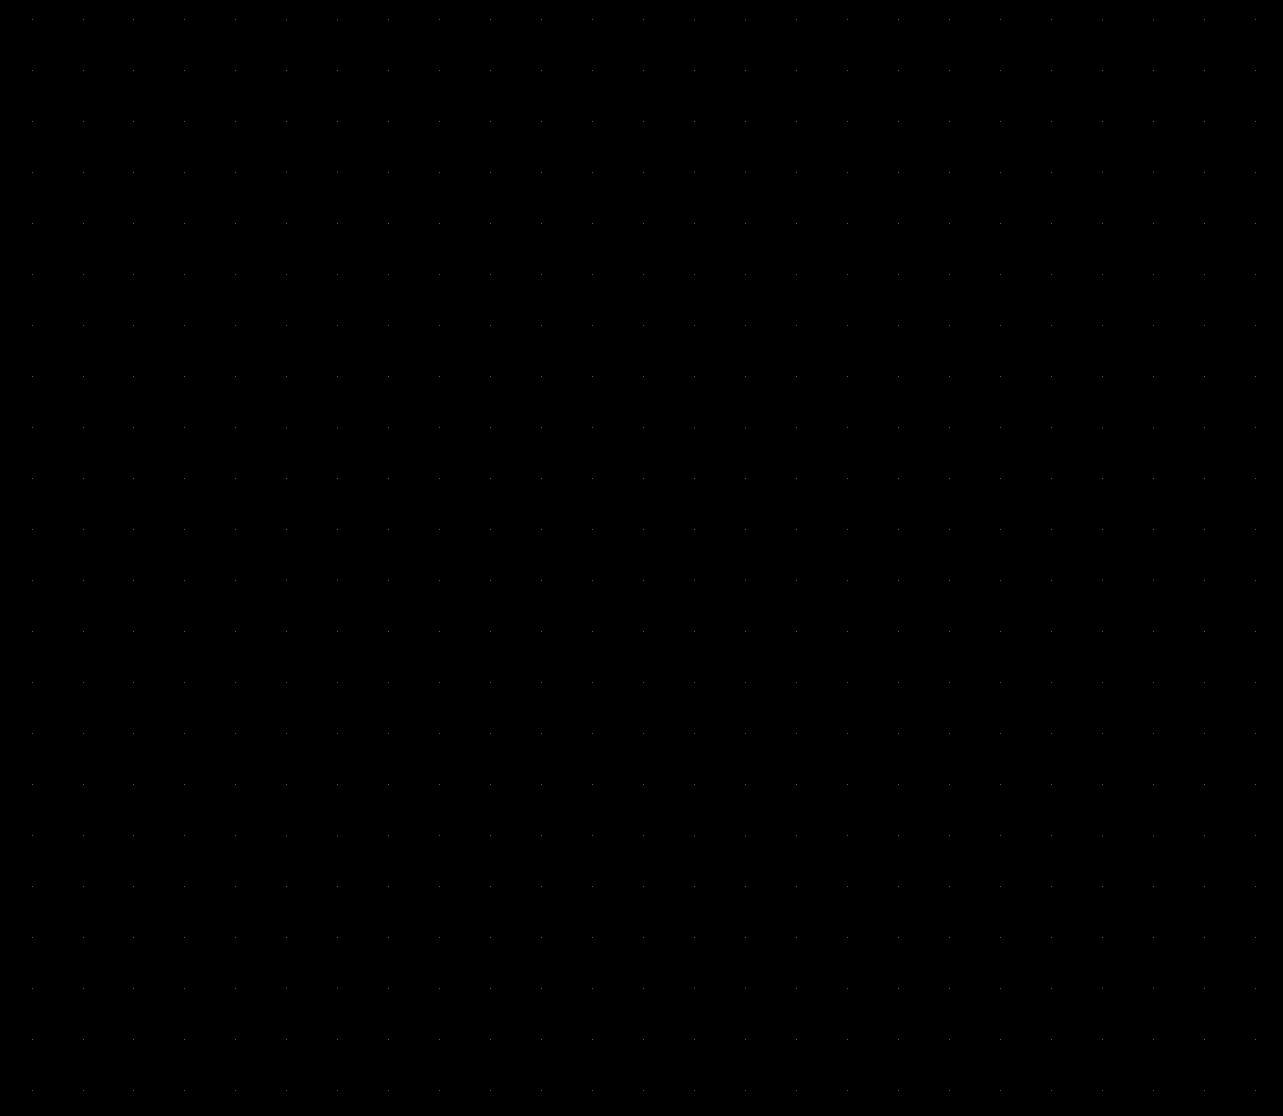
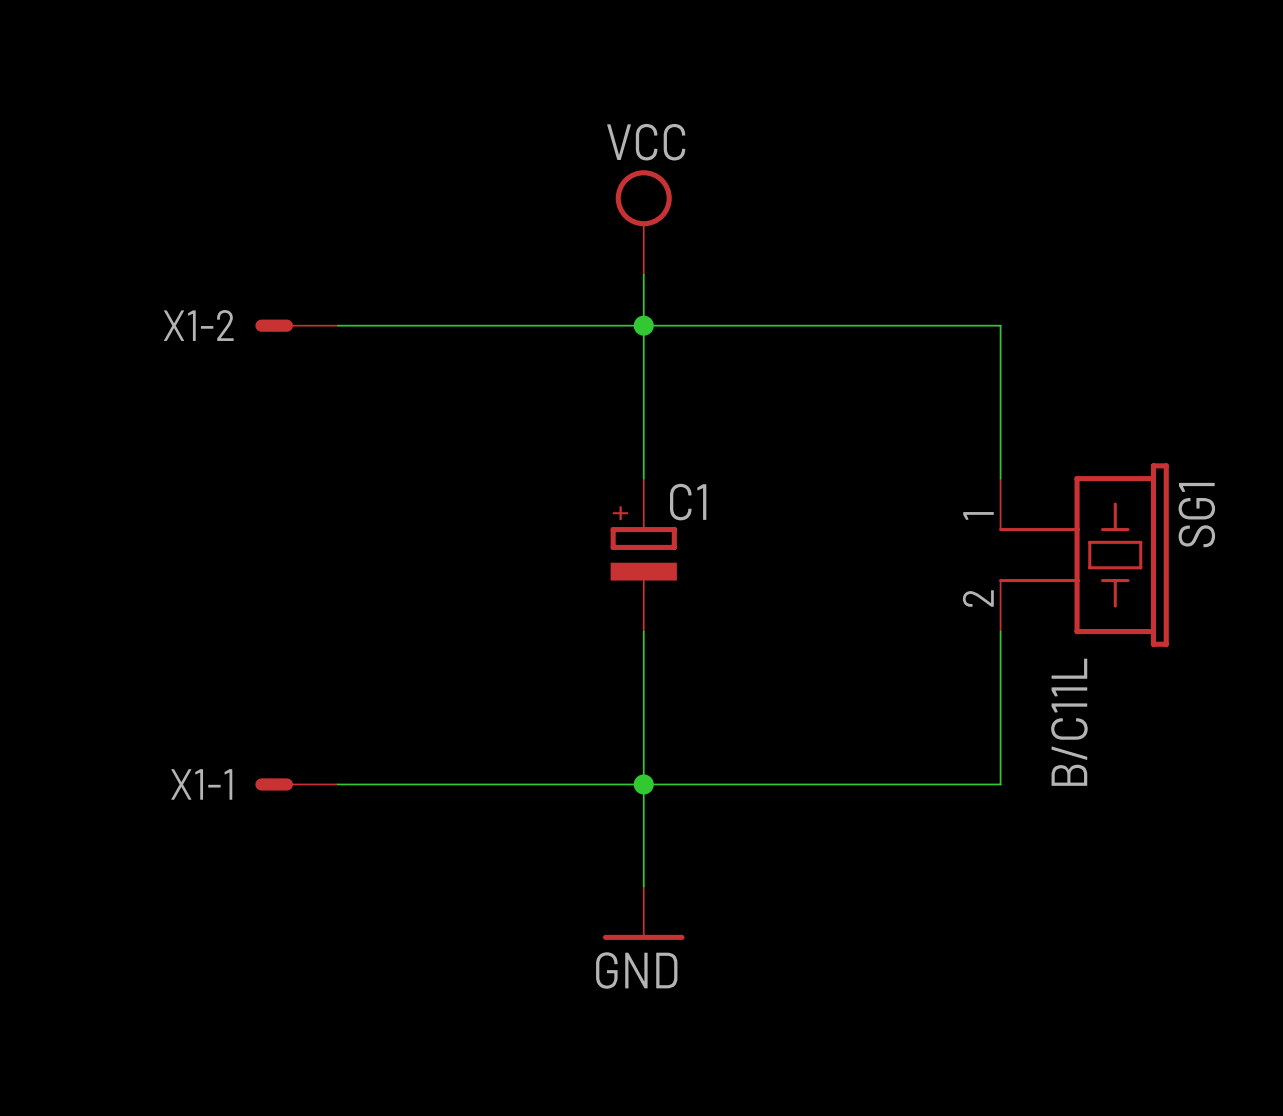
power symbol: none -> VCC (643, 222)
wire: none -> (643, 274) (643, 478)
X1-2: none -> (296, 325)
wire: none -> (337, 325) (1000, 325) (1000, 478)
junction: none -> (643, 325)
C1: none -> (643, 555)
SG1: none -> B/C11L (1083, 555)
wire: none -> (643, 631) (643, 886)
wire: none -> (1000, 631) (1000, 784) (337, 784)
X1-1: none -> (296, 784)
junction: none -> (643, 784)
power symbol: none -> GND (643, 913)

